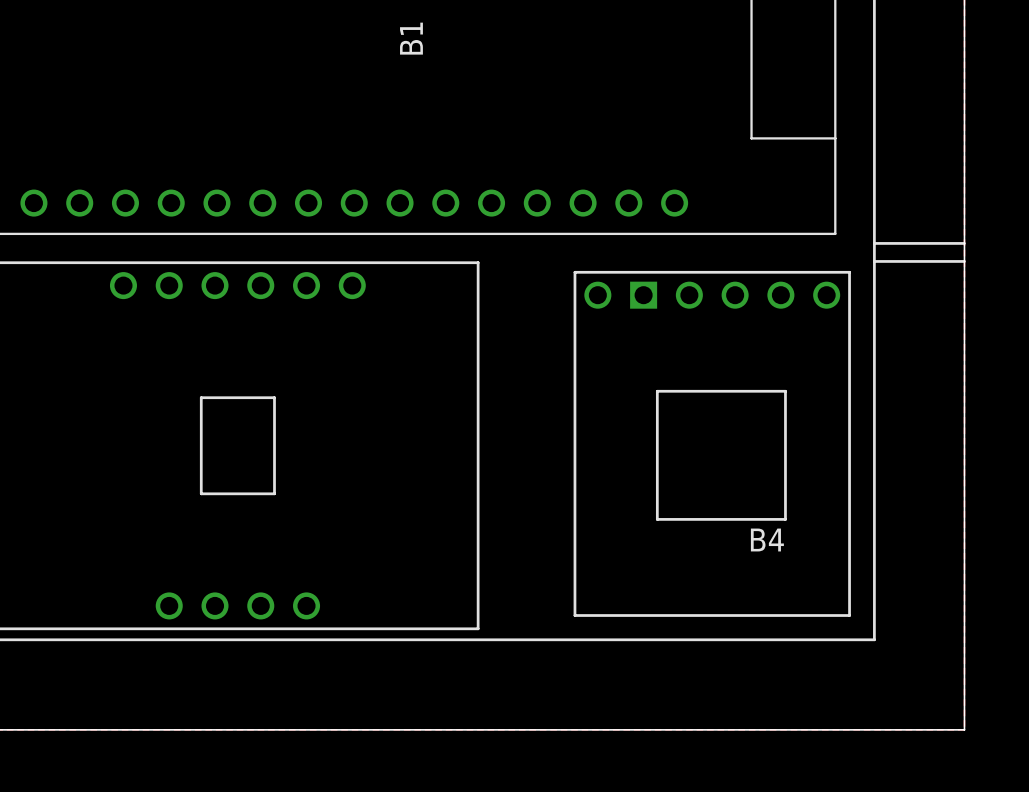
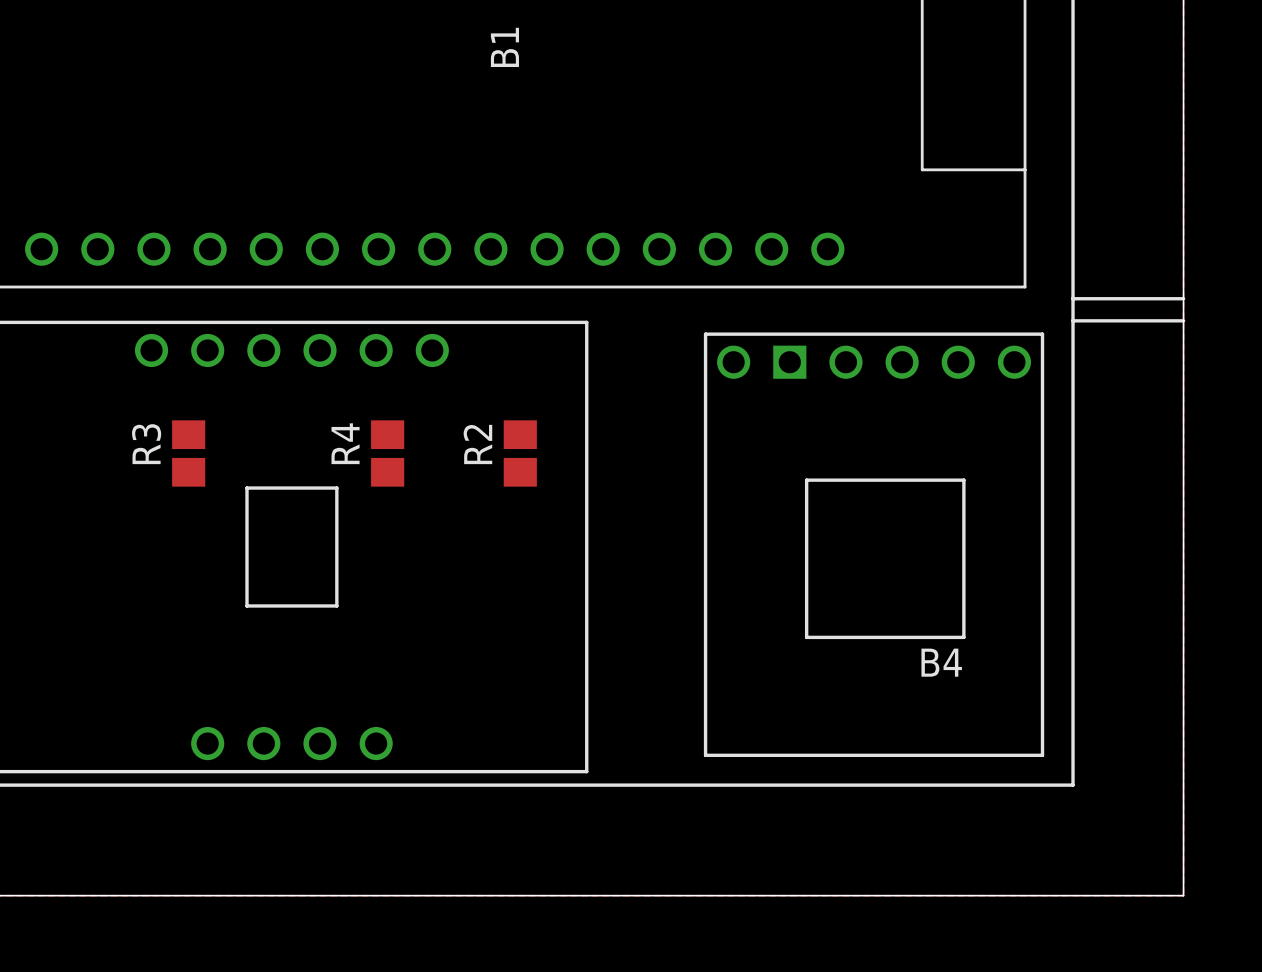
R3: none -> (188, 453)
R4: none -> (387, 453)
R2: none -> (520, 453)

